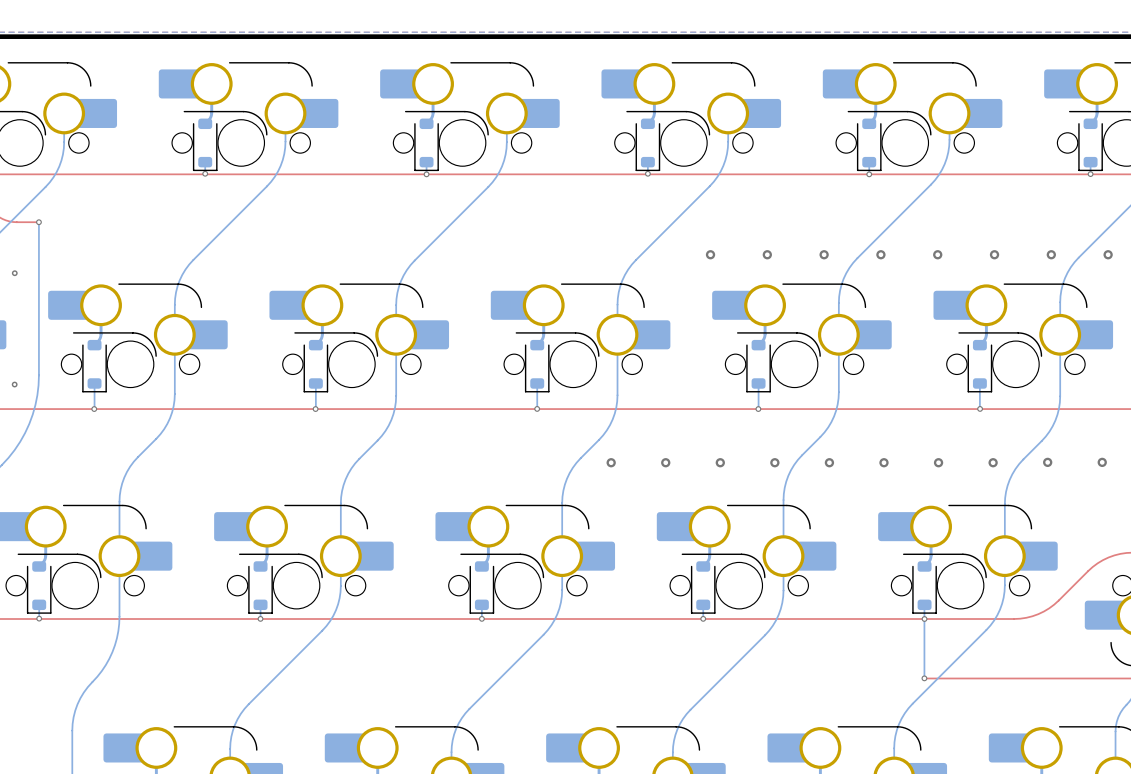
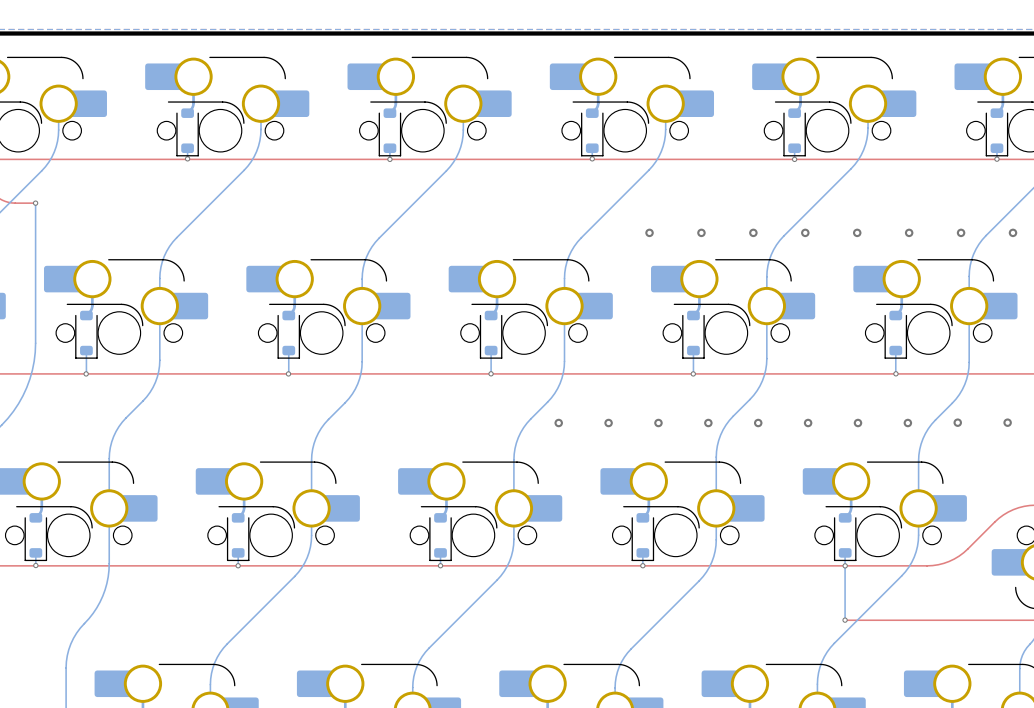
via: (14, 273) -> none
via: (14, 384) -> none

